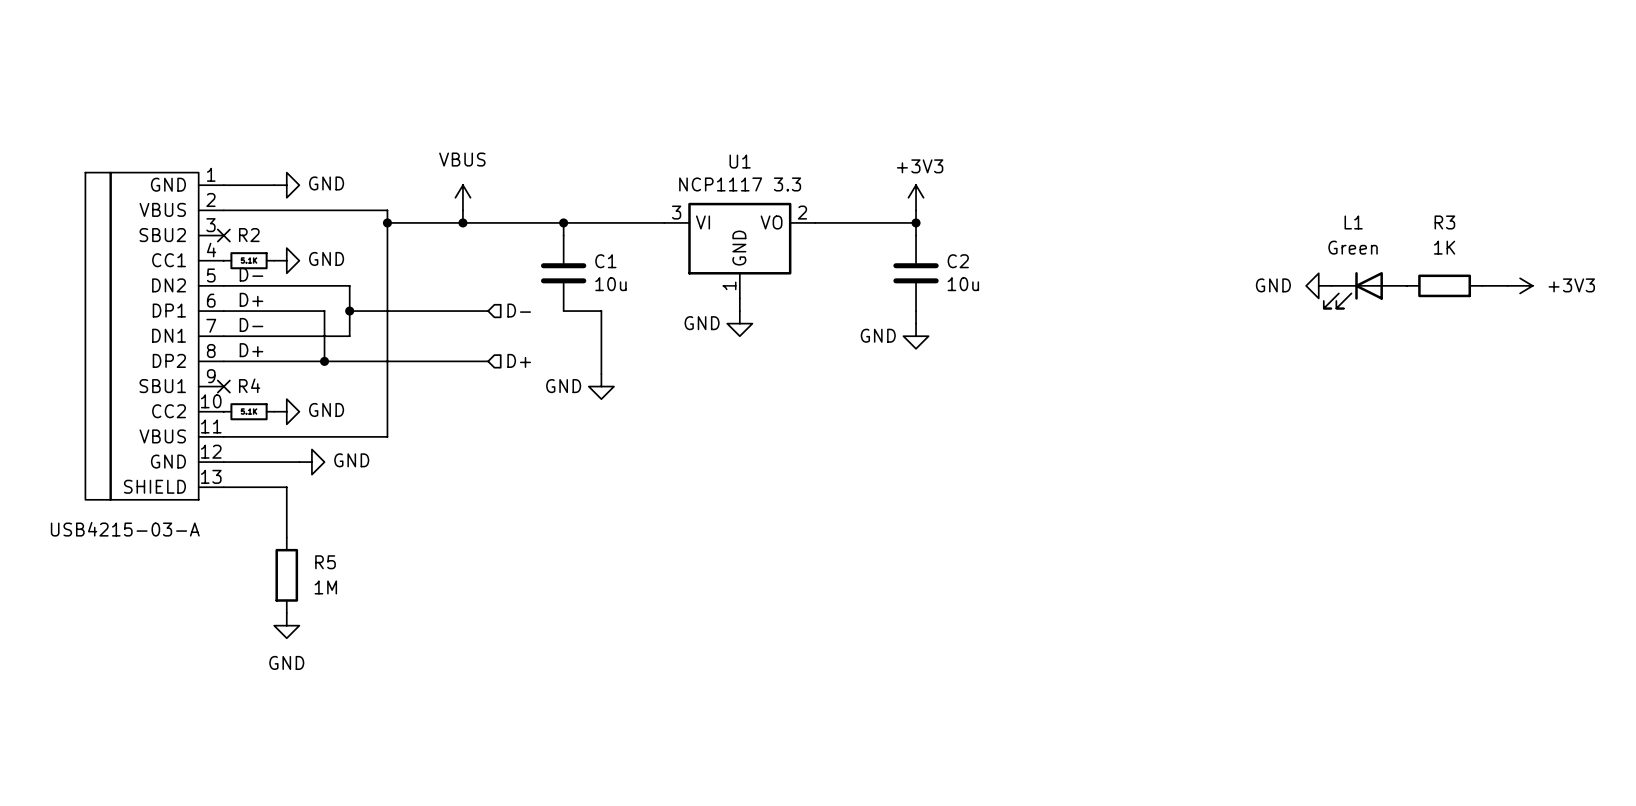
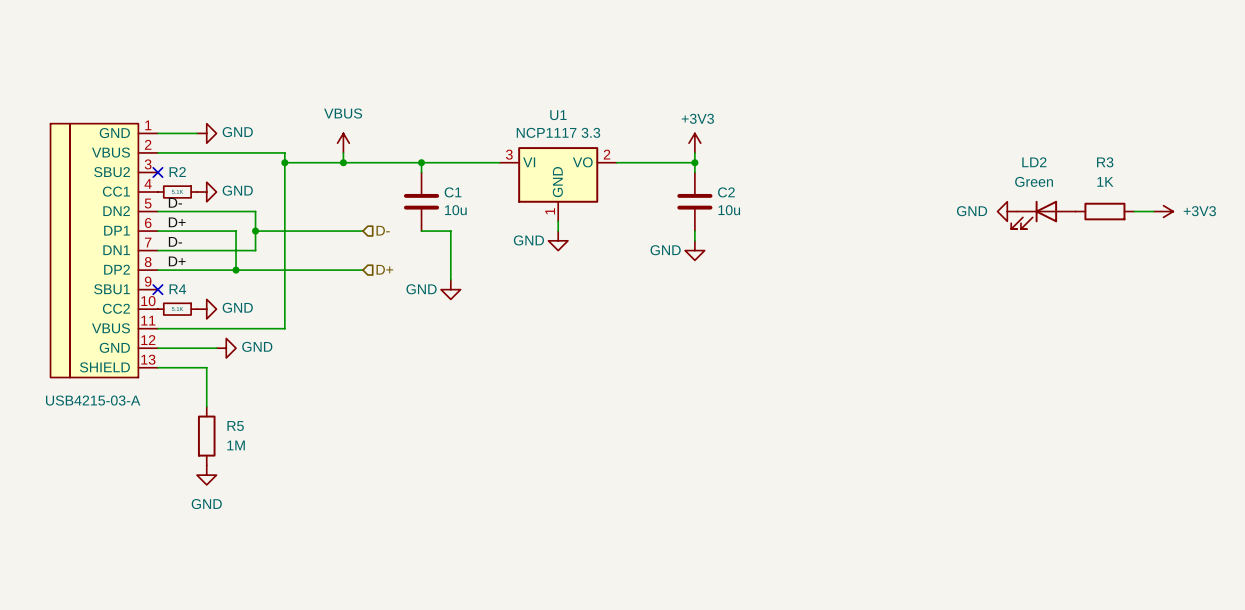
L1 name: L1 (1353, 222) -> LD2 (1034, 162)

